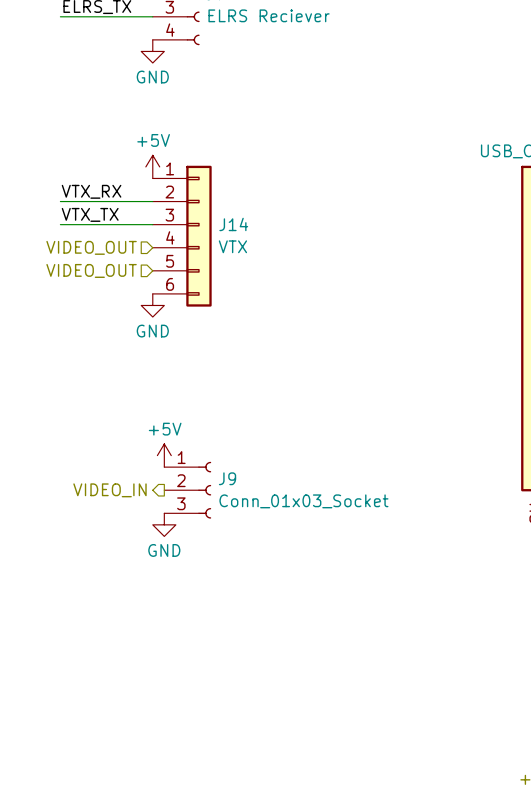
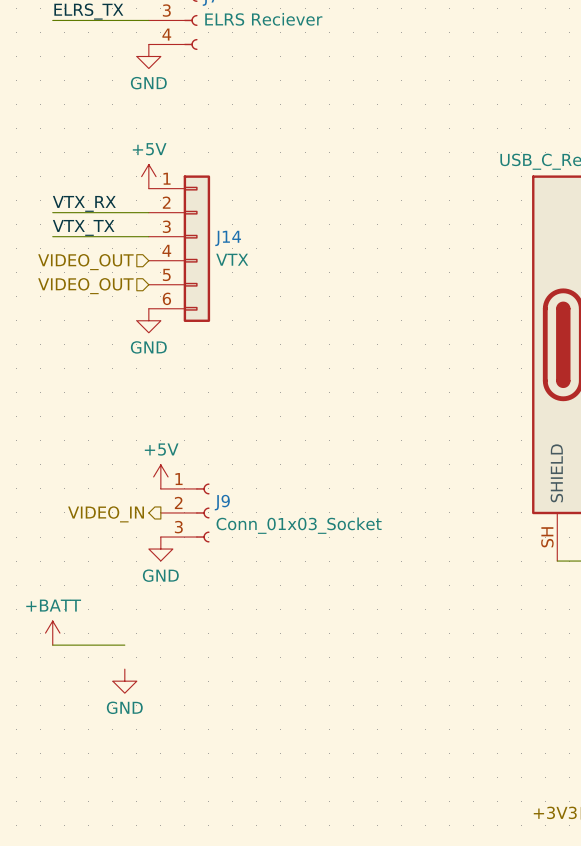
power symbol: none -> +BATT (52, 633)
wire: none -> (52, 645) (124, 645)
power symbol: none -> GND (124, 681)

